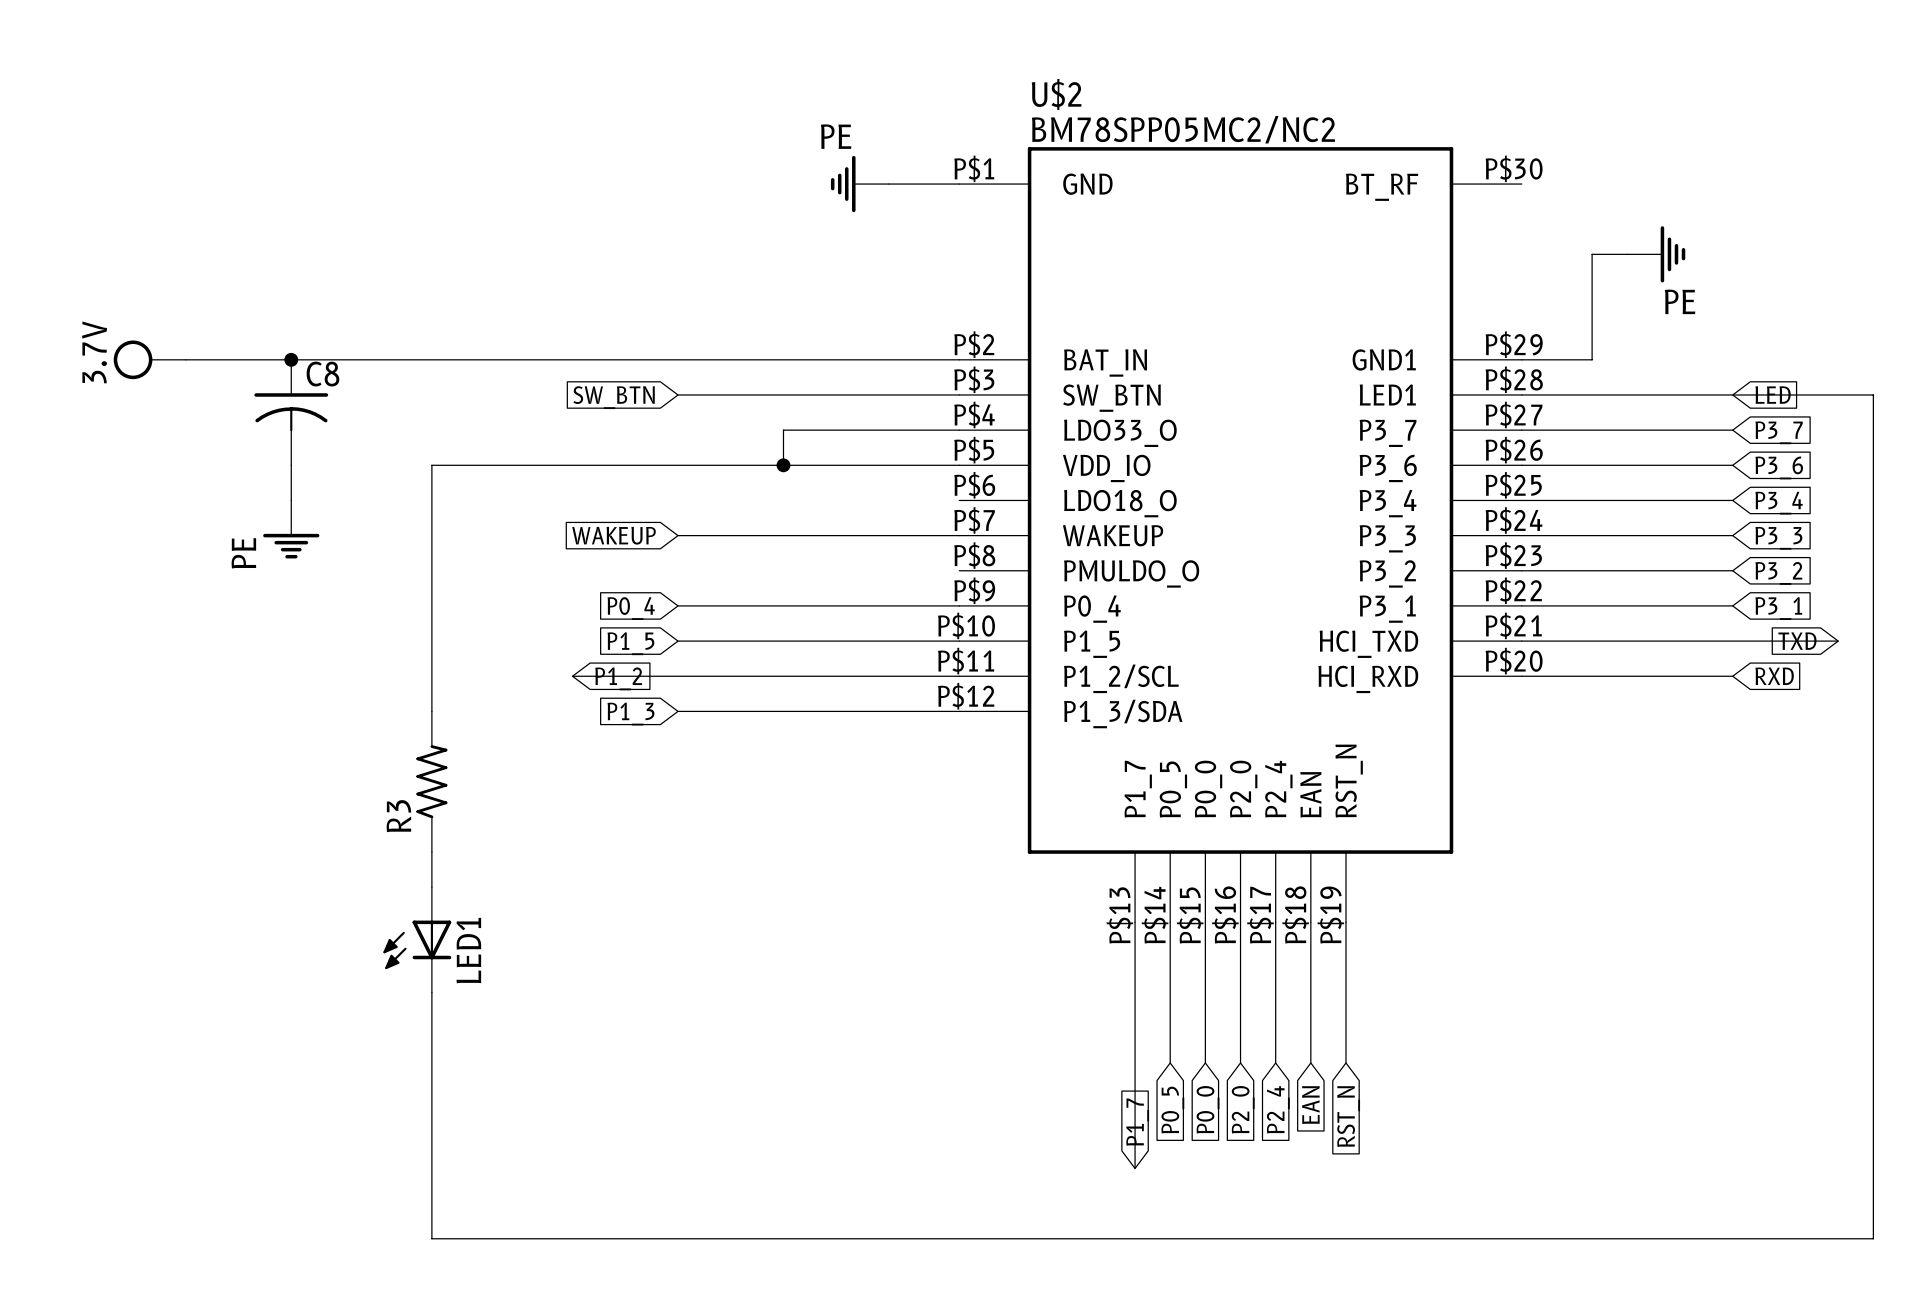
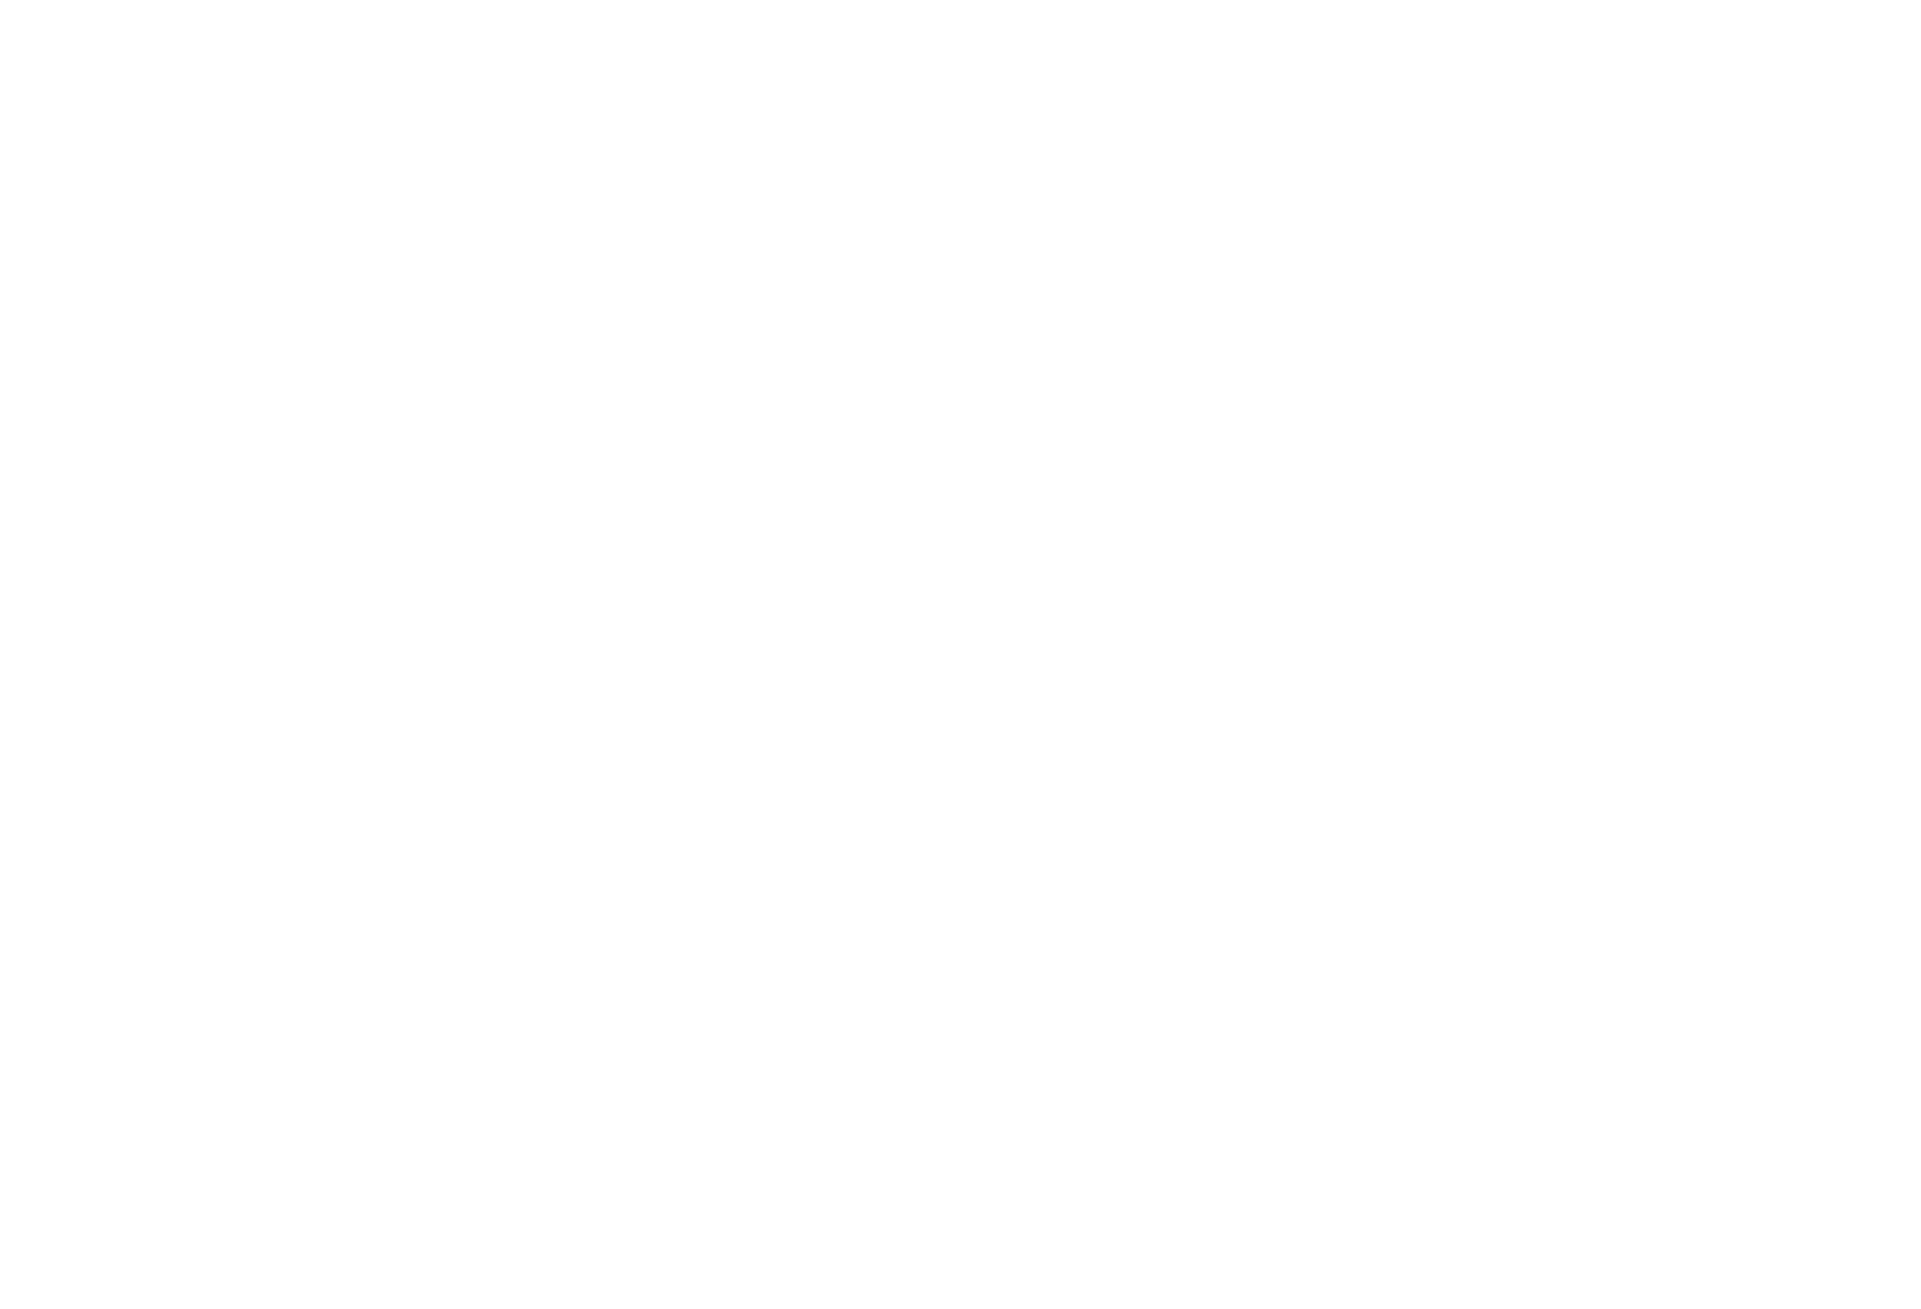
power symbol: PE (859, 184) -> none
wire: (888, 184) (959, 184) -> none
wire: (1627, 254) (1592, 254) (1592, 359) (1521, 359) -> none
power symbol: PE (1656, 254) -> none
power symbol: 3.7V (149, 359) -> none
wire: (185, 359) (959, 359) -> none
junction: (291, 359) -> none
wire: (678, 394) (959, 394) -> none
wire: (1521, 394) (1873, 394) (1873, 1238) (431, 1238) (431, 992) -> none
global label: LED (1773, 394) -> none
global label: SW_BTN (614, 397) -> none
C8: (291, 412) -> none
wire: (959, 430) (783, 430) (783, 465) -> none
wire: (1521, 430) (1732, 430) -> none
global label: P3_7 (1779, 432) -> none
wire: (291, 465) (291, 500) -> none
junction: (783, 465) -> none
wire: (959, 465) (431, 465) (431, 711) -> none
wire: (1521, 465) (1732, 465) -> none
global label: P3_6 (1779, 467) -> none
wire: (1521, 500) (1732, 500) -> none
global label: P3_4 (1779, 503) -> none
power symbol: PE (291, 529) -> none
U$2: BM78SPP05MC2/NC2 (1240, 534) -> none
global label: WAKEUP (614, 535) -> none
wire: (678, 535) (959, 535) -> none
wire: (1521, 535) (1732, 535) -> none
global label: P3_3 (1778, 538) -> none
wire: (1521, 570) (1732, 570) -> none
global label: P3_2 (1778, 573) -> none
wire: (678, 605) (959, 605) -> none
wire: (1521, 605) (1732, 605) -> none
global label: P0_4 (631, 608) -> none
global label: P3_1 (1778, 608) -> none
wire: (678, 641) (959, 641) -> none
wire: (1521, 641) (1838, 641) -> none
global label: TXD (1797, 641) -> none
global label: P1_5 (630, 643) -> none
wire: (572, 676) (959, 676) -> none
wire: (1521, 676) (1732, 676) -> none
global label: RXD (1774, 676) -> none
global label: P1_2 (618, 678) -> none
wire: (678, 711) (959, 711) -> none
global label: P1_3 (630, 714) -> none
R3: (431, 781) -> none
wire: (431, 852) (431, 887) -> none
wire: (1135, 922) (1135, 1168) -> none
wire: (1170, 922) (1170, 1062) -> none
wire: (1205, 922) (1205, 1062) -> none
wire: (1240, 922) (1240, 1062) -> none
wire: (1275, 922) (1275, 1062) -> none
wire: (1310, 922) (1310, 1062) -> none
wire: (1346, 922) (1346, 1062) -> none
LED1: (417, 939) -> none
global label: EAN (1310, 1105) -> none
global label: P0_0 (1208, 1109) -> none
global label: P2_0 (1243, 1109) -> none
global label: P2_4 (1278, 1109) -> none
global label: P0_5 (1172, 1110) -> none
global label: RST_N (1348, 1116) -> none
global label: P1_7 (1137, 1122) -> none

